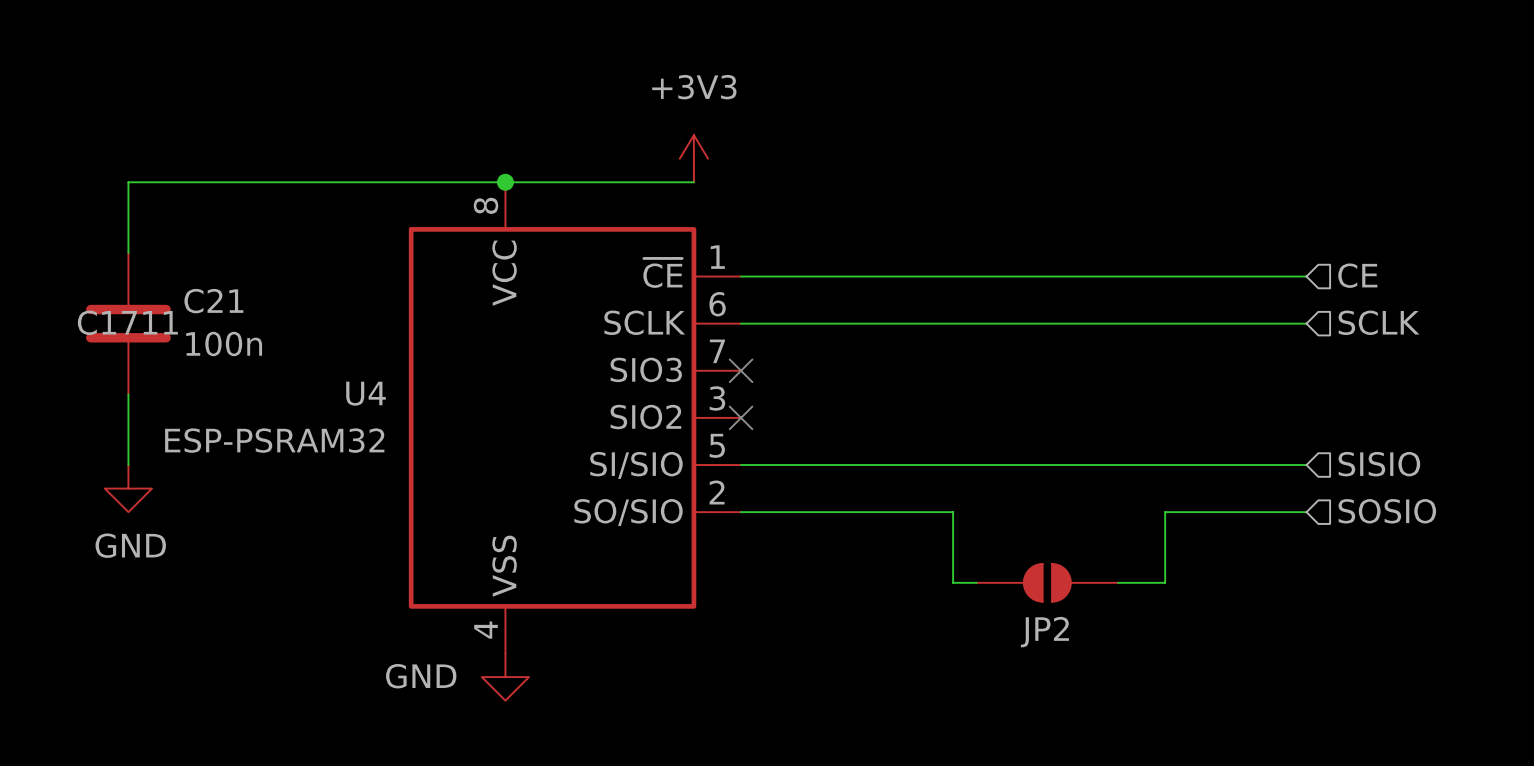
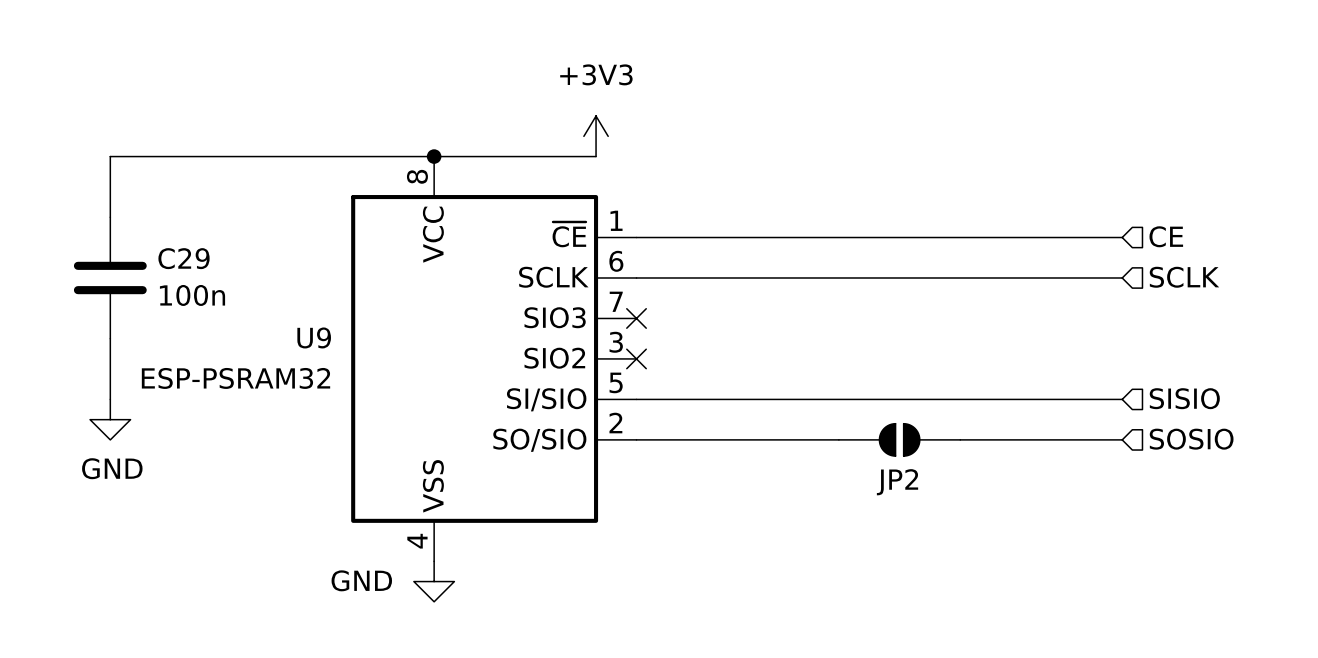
C21 name: C21 (213, 301) -> C29 (184, 258)
C21 text: C1711 (127, 322) -> none
U4 name: U4 (366, 393) -> U9 (314, 337)
wire: (953, 512) (953, 582) (976, 582) -> (818, 439) (838, 439)
wire: (1165, 512) (1165, 582) (1118, 582) -> (1000, 439) (960, 439)
JP2 position: (1047, 582) -> (899, 439)

